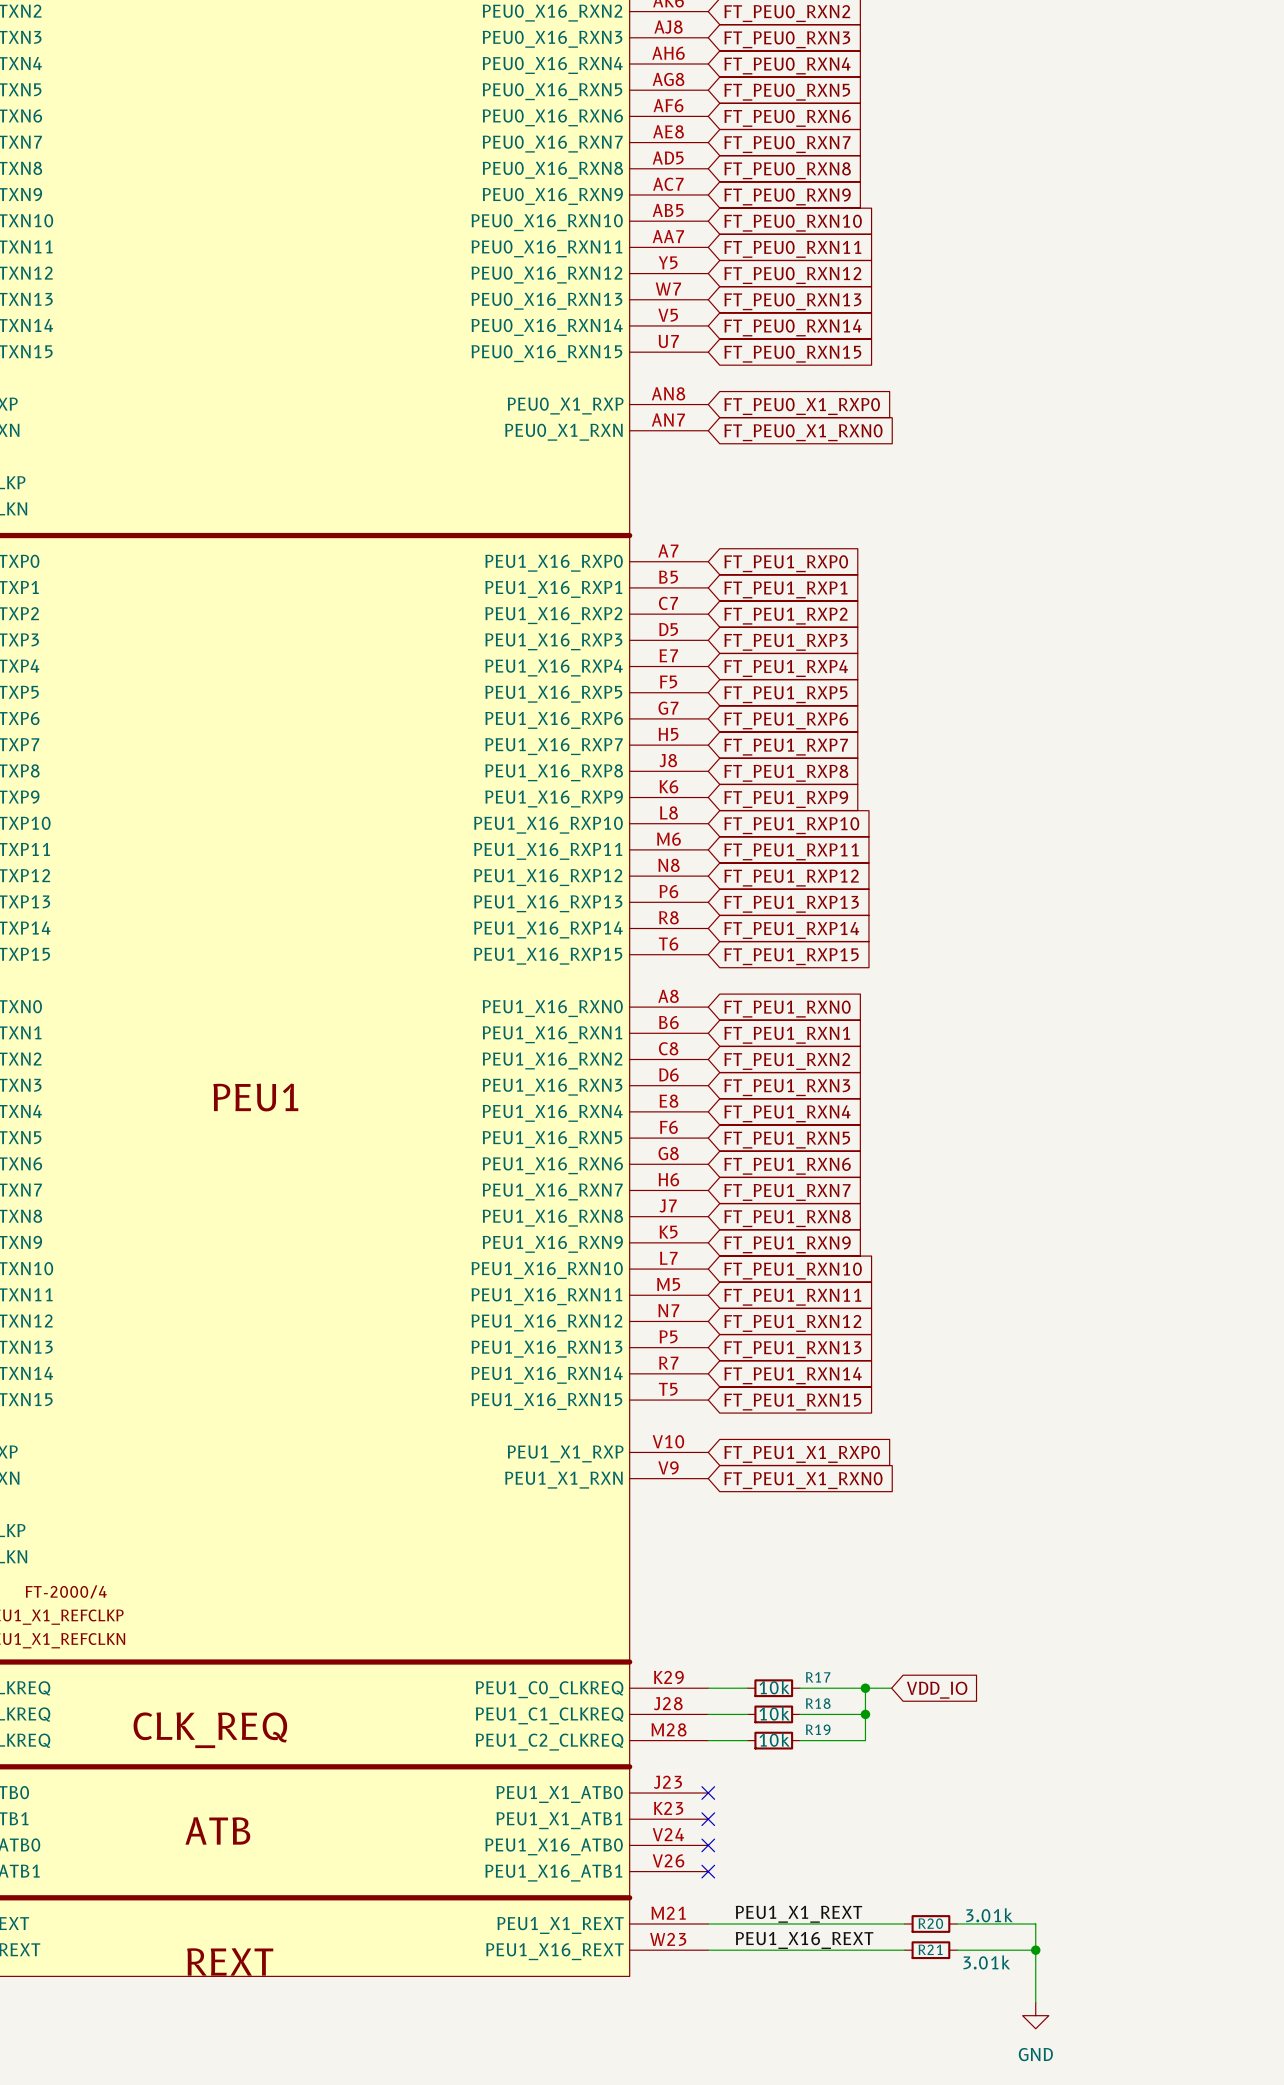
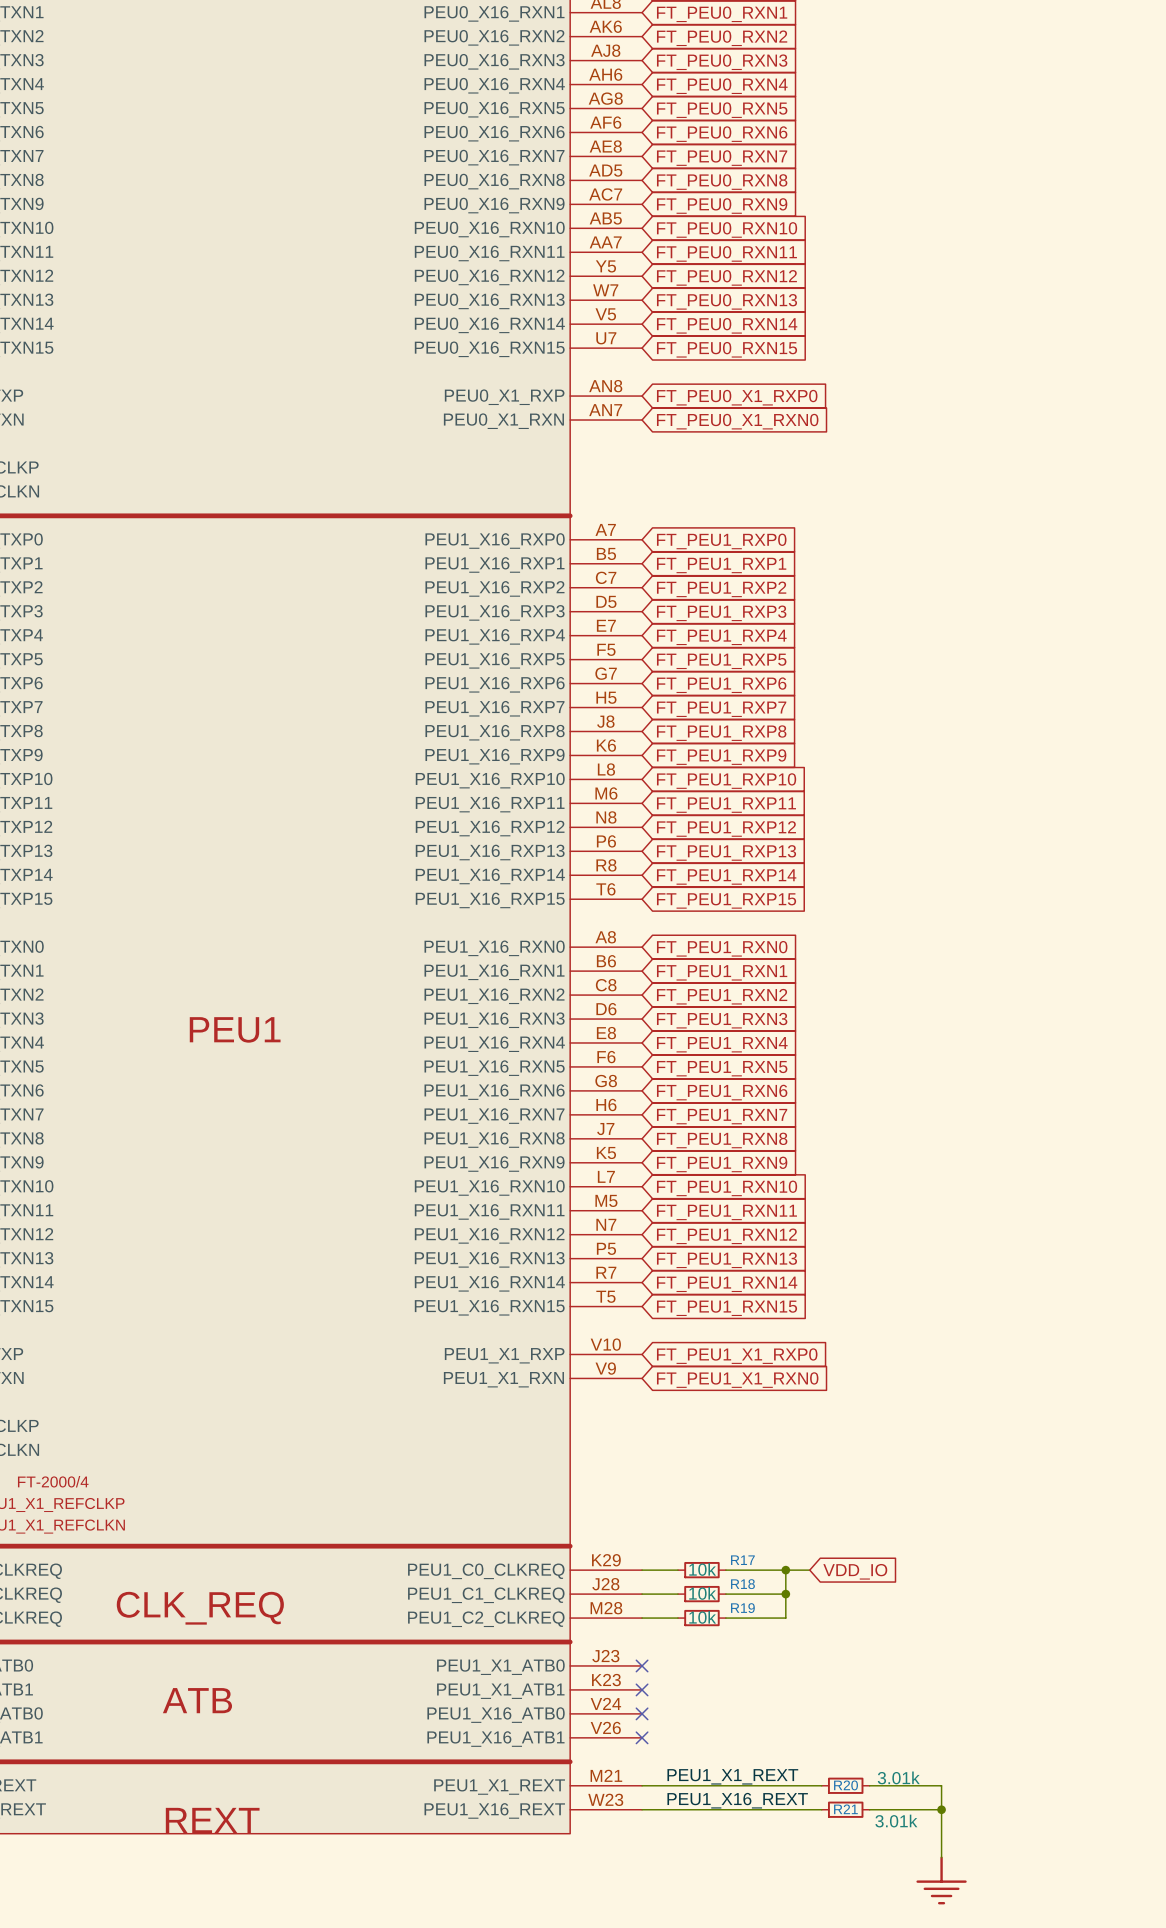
power symbol: GND (1035, 2015) -> none
power symbol: none -> (941, 1880)

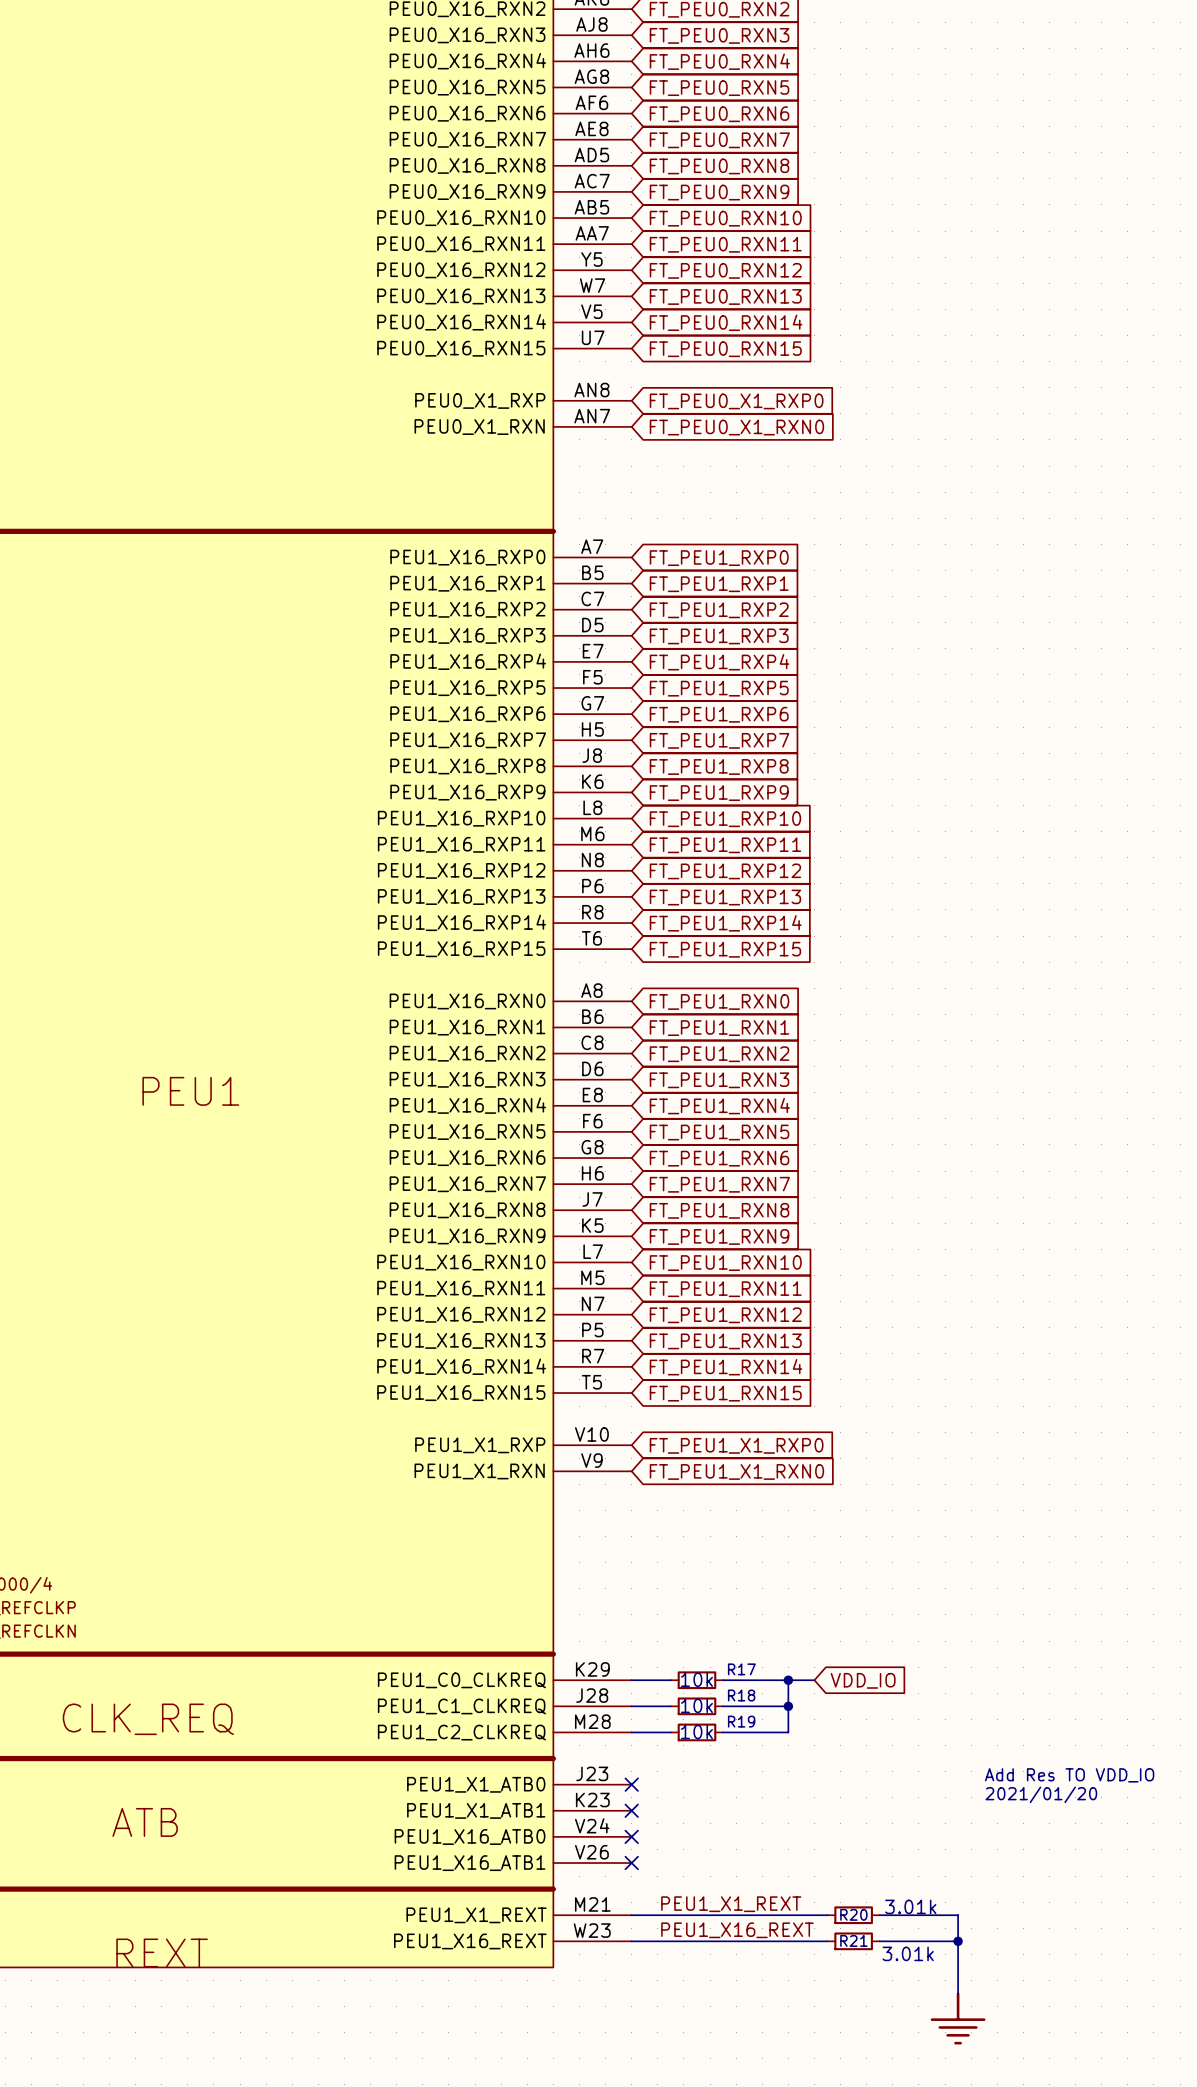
text: none -> Add Res TO VDD_IO (1069, 1775)
text: none -> 2021/01/20 (1041, 1794)

